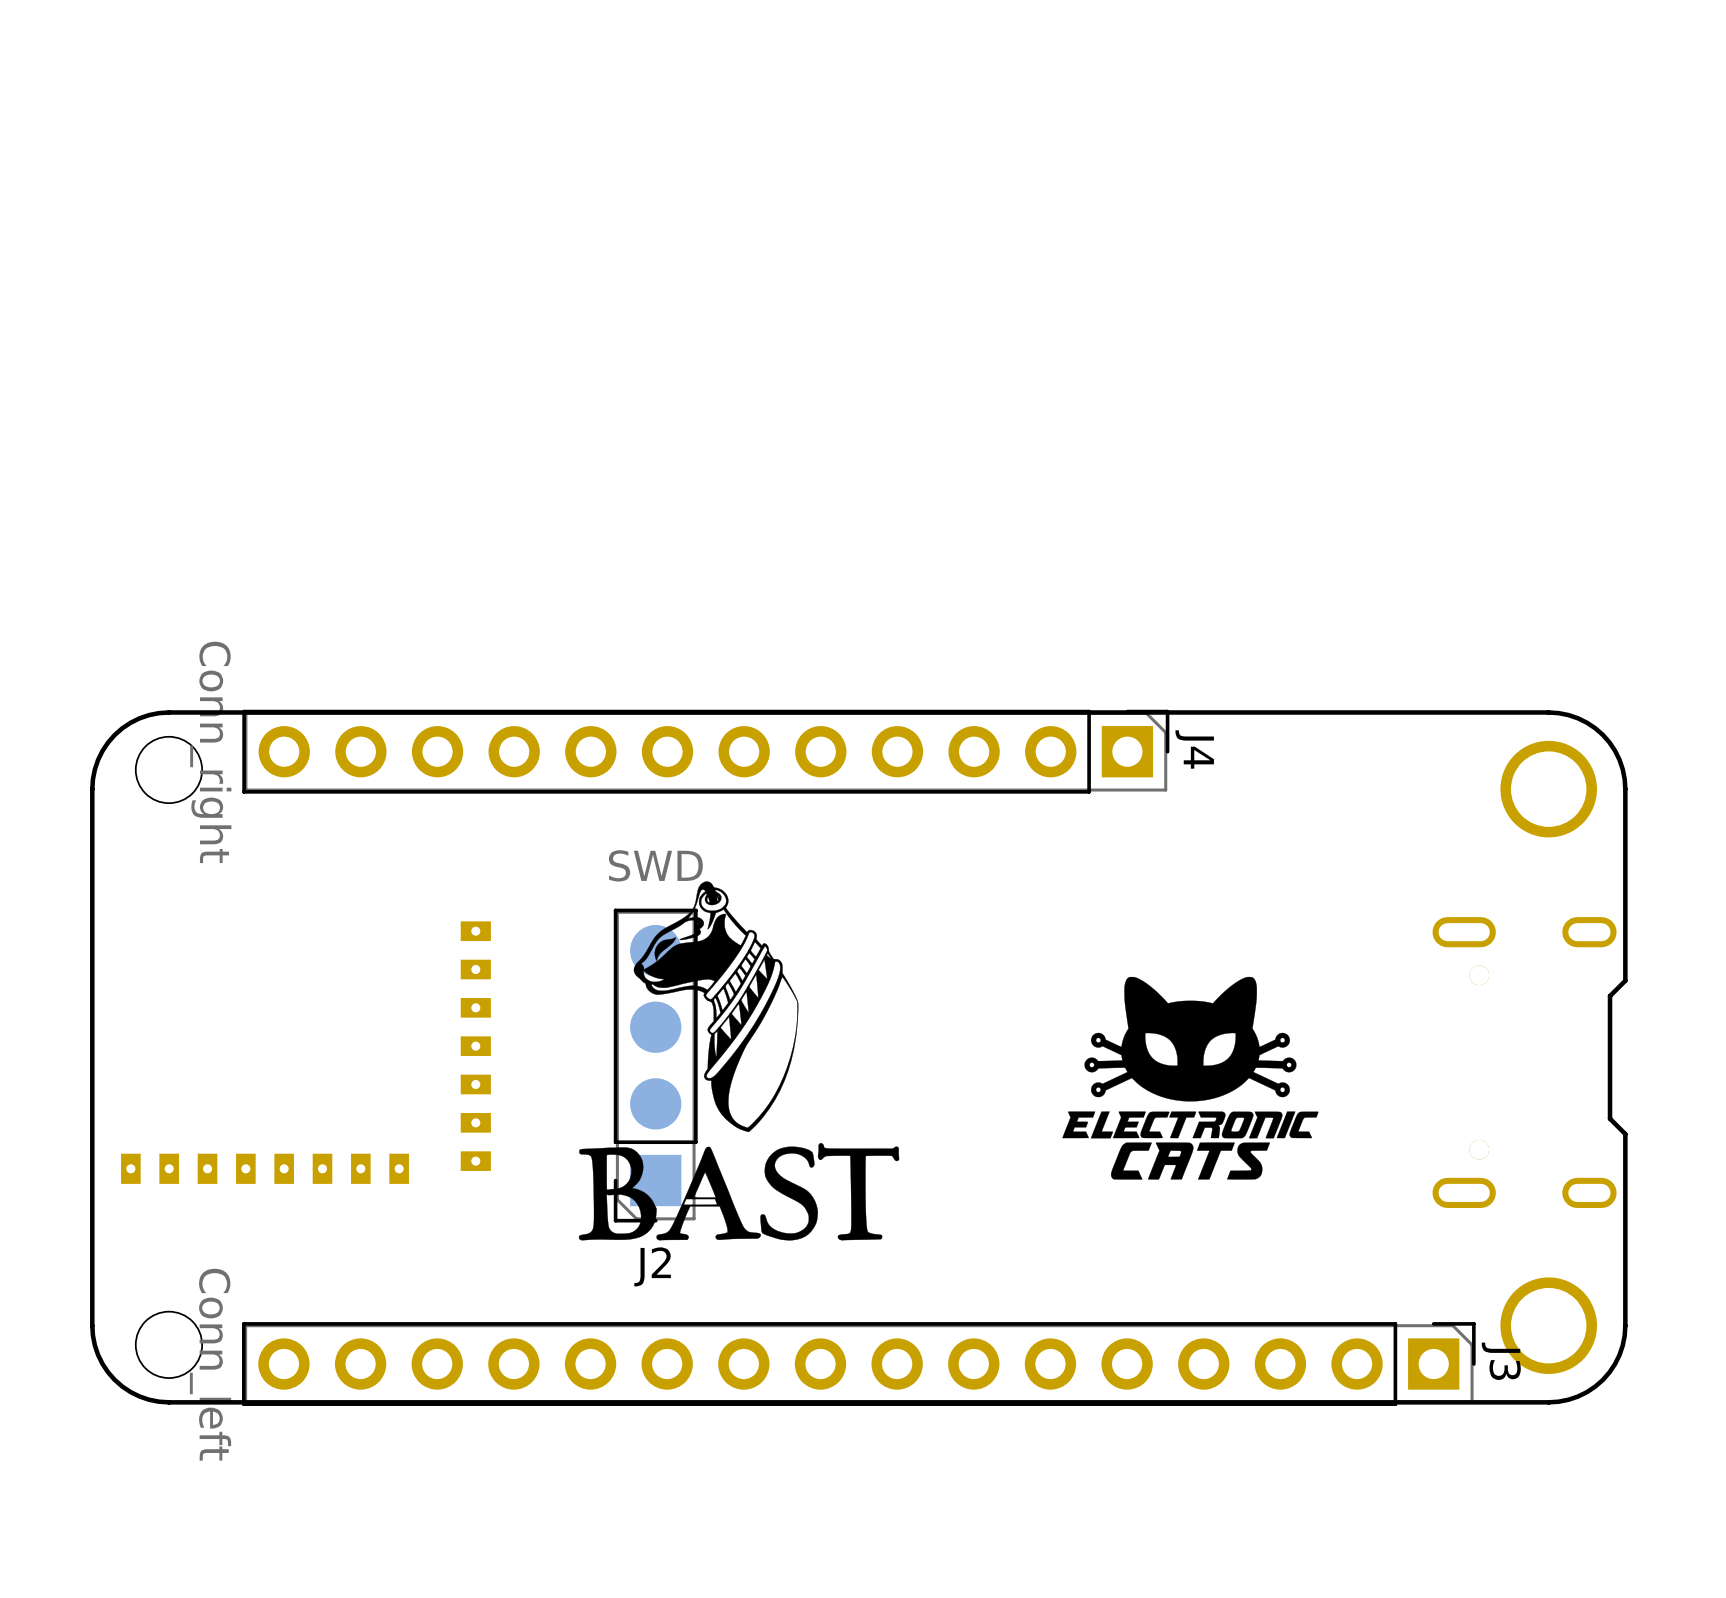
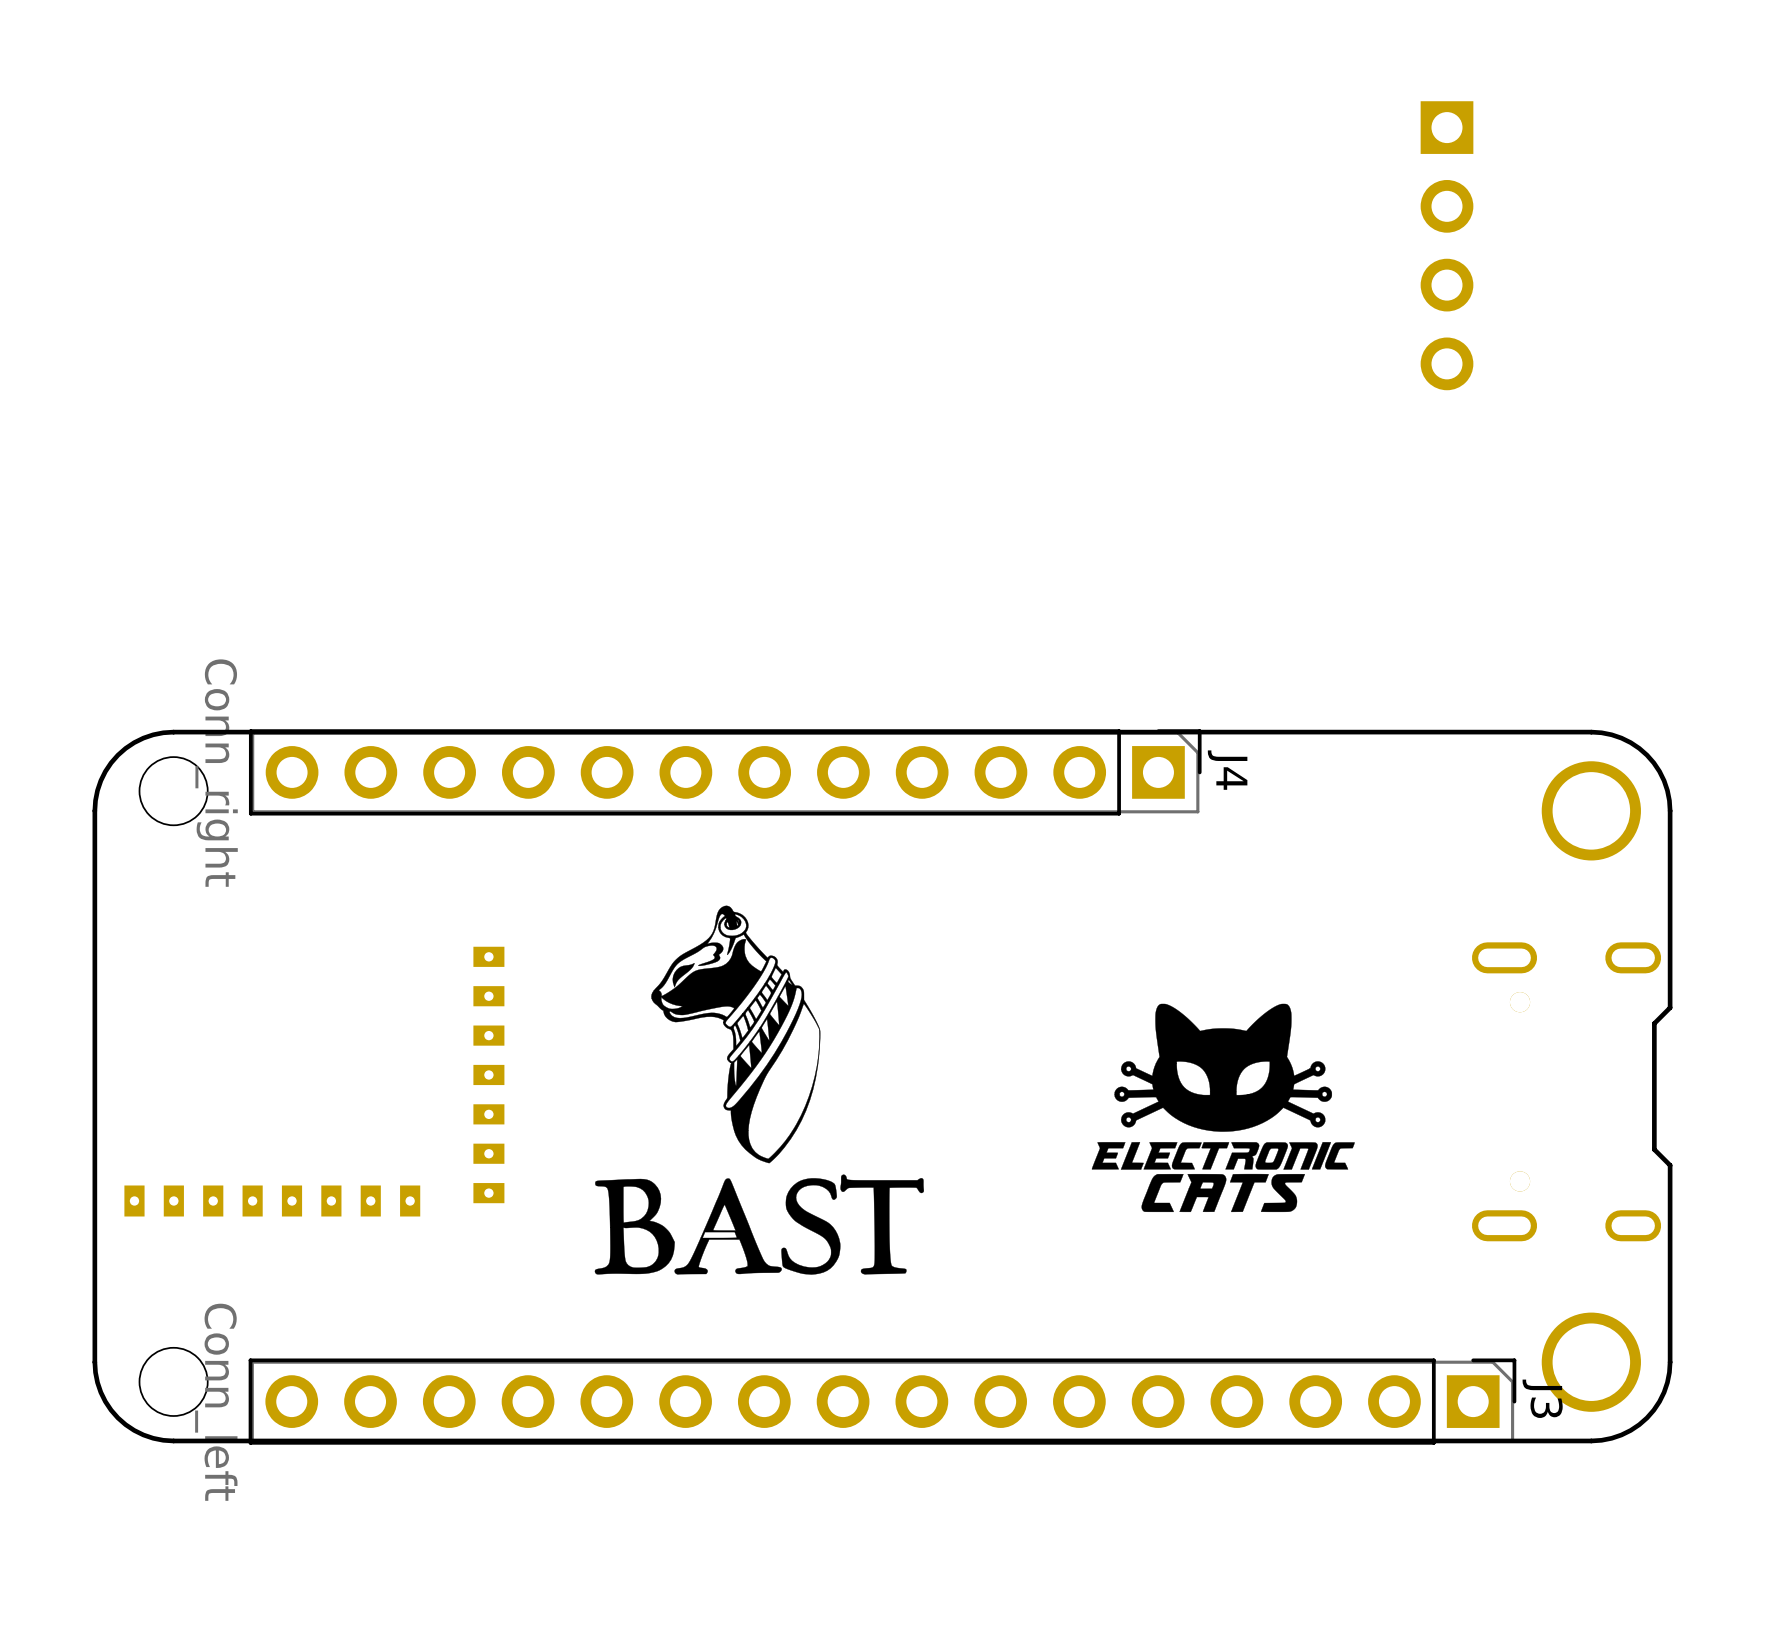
part: none -> (1447, 245)
J2: SWD (655, 1065) -> none

